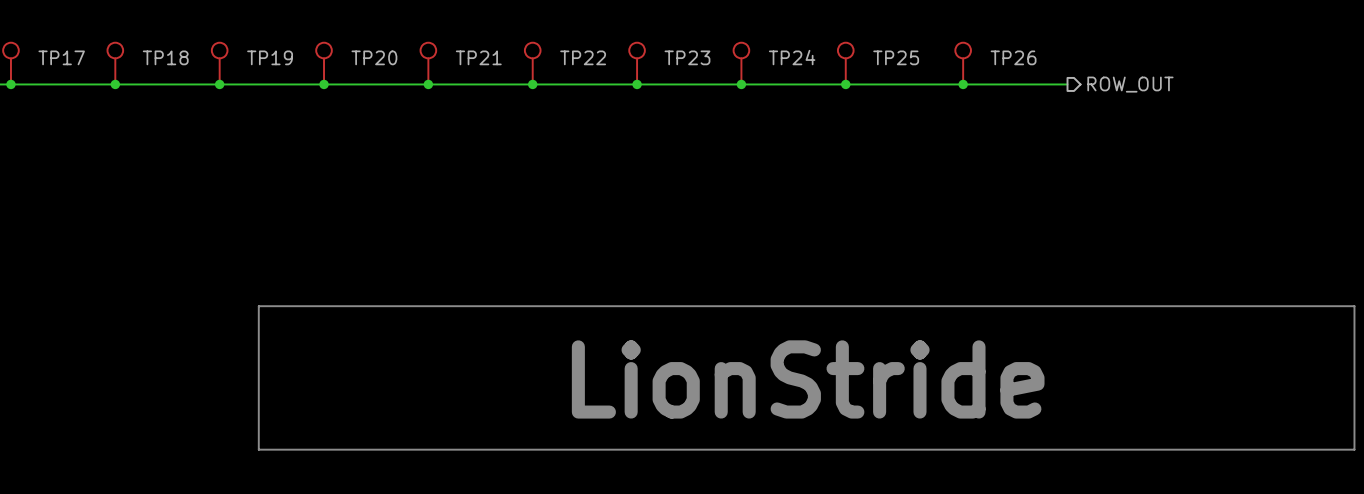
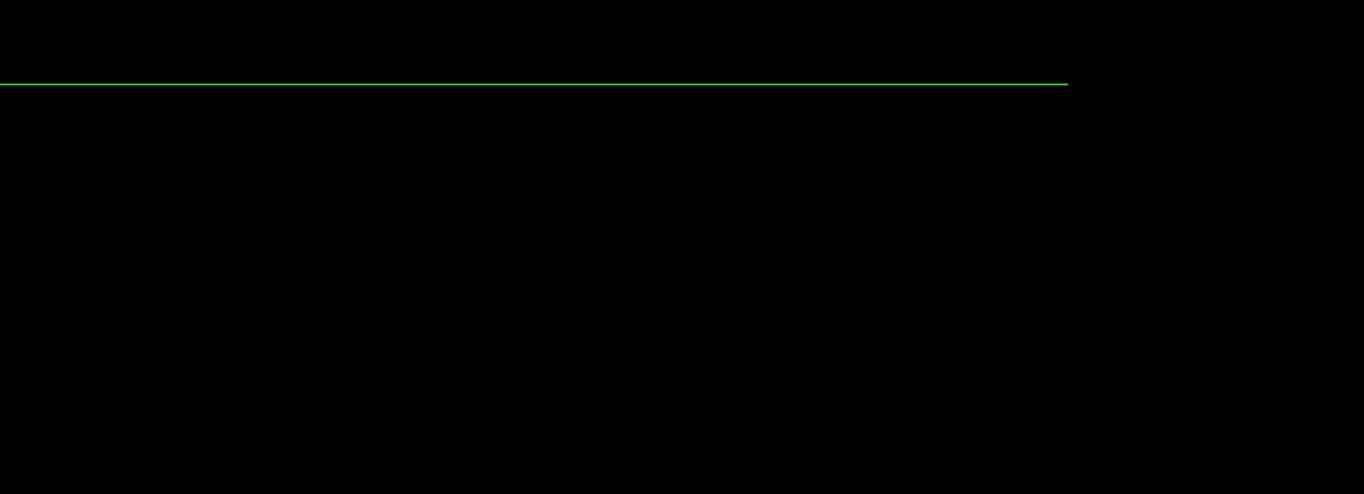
TP17: (10, 63) -> none
TP18: (115, 63) -> none
TP19: (219, 63) -> none
TP20: (324, 63) -> none
TP21: (428, 63) -> none
TP22: (532, 63) -> none
TP23: (637, 63) -> none
TP24: (741, 63) -> none
TP25: (845, 63) -> none
TP26: (963, 63) -> none
junction: (10, 84) -> none
junction: (115, 84) -> none
junction: (219, 84) -> none
junction: (324, 84) -> none
junction: (428, 84) -> none
junction: (532, 84) -> none
junction: (637, 84) -> none
junction: (741, 84) -> none
junction: (845, 84) -> none
junction: (963, 84) -> none
hierarchical label: ROW_OUT (1130, 84) -> none
line: (258, 306) (1354, 306) (1354, 449) (258, 449) (258, 306) -> none
text: LionStride (808, 379) -> none

